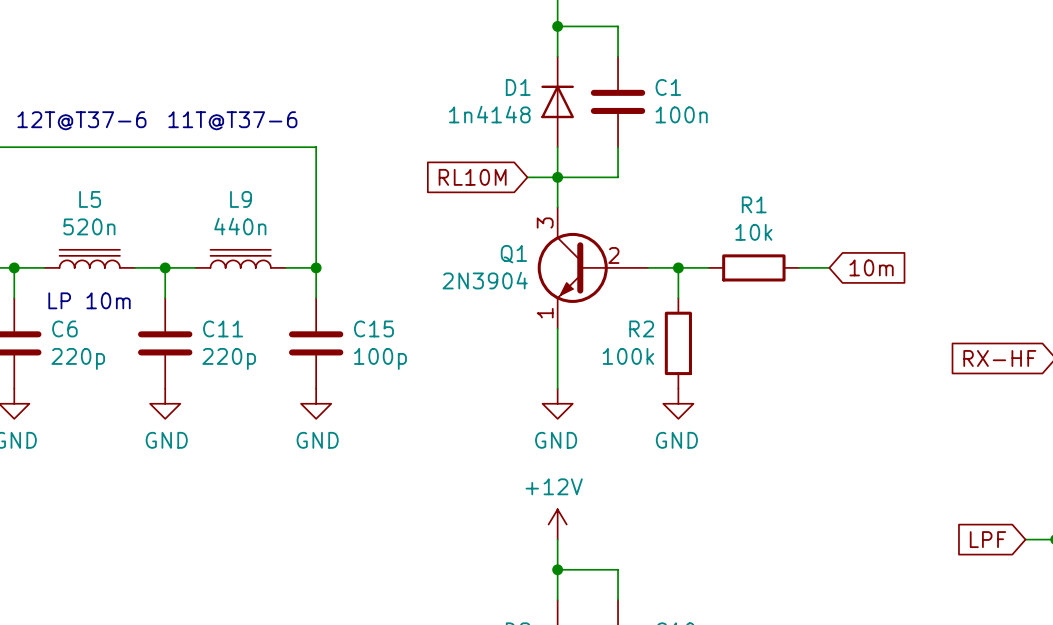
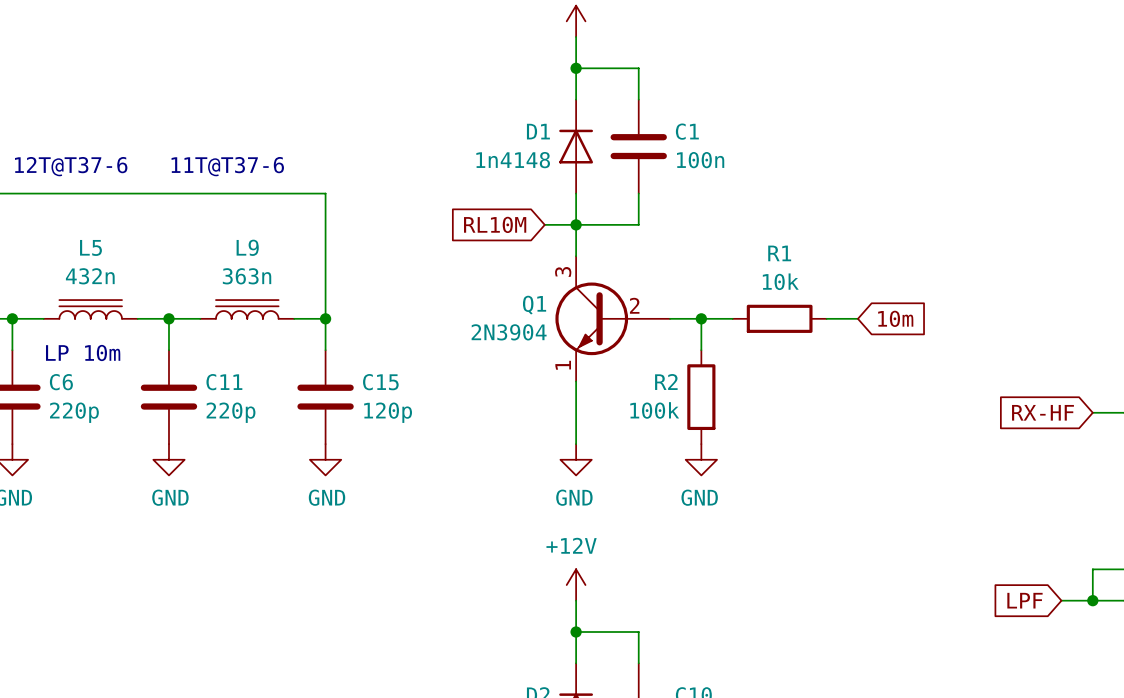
L5 value: 520n (89, 226) -> 432n (90, 276)
L9 value: 440n (240, 226) -> 363n (247, 276)
C15 value: 100p (380, 358) -> 120p (388, 412)

